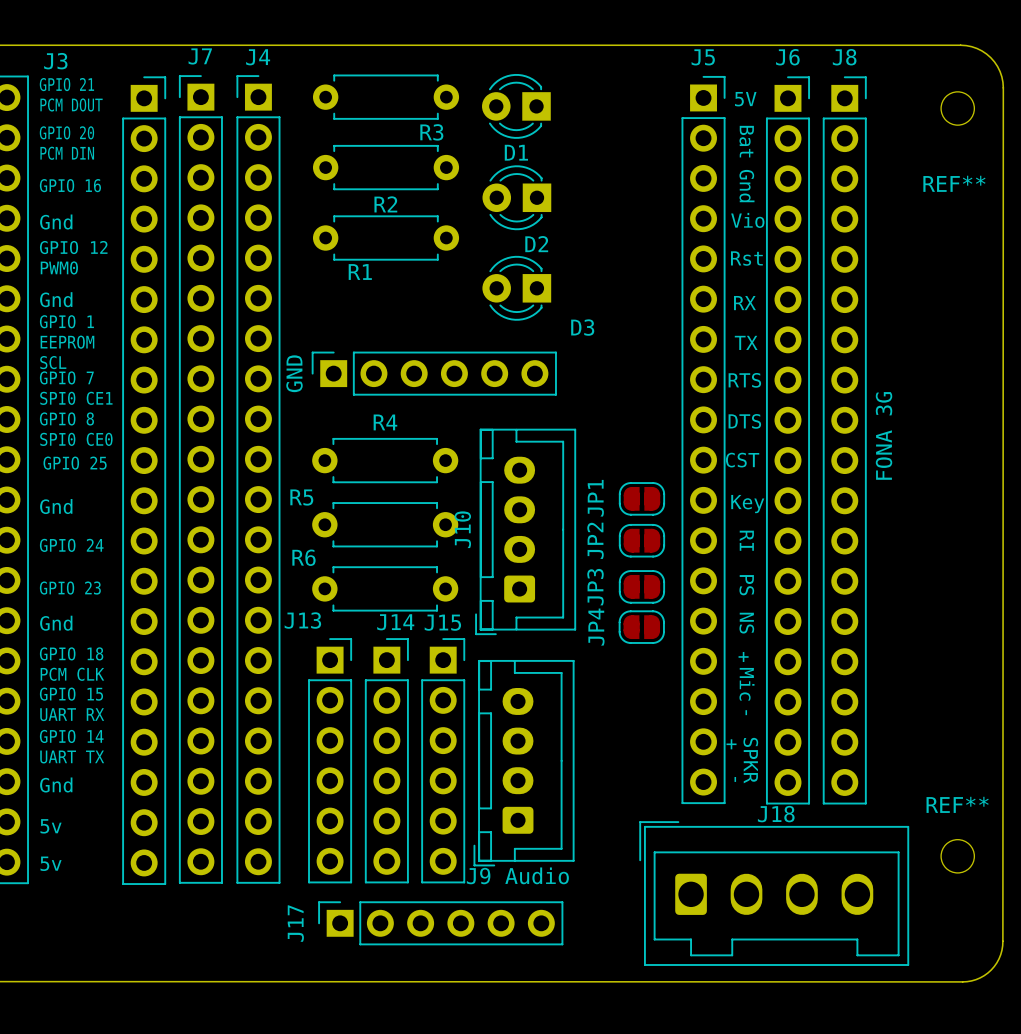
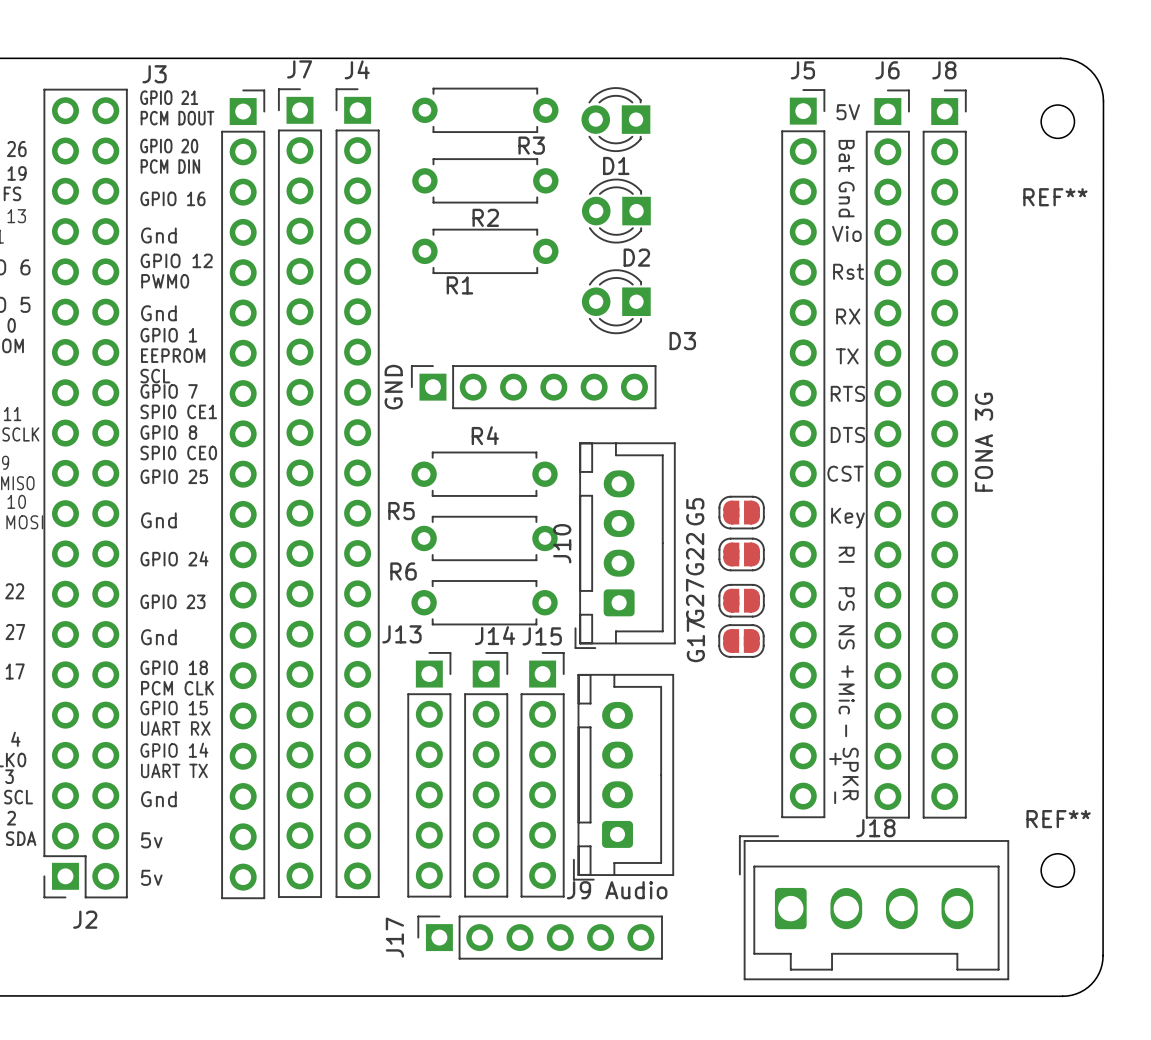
JP1 name: JP1 (595, 498) -> G5 (695, 511)
JP2 name: JP2 (595, 540) -> G22 (695, 554)
JP3 name: JP3 (595, 587) -> G27 (695, 600)
JP4 name: JP4 (596, 627) -> G17 (695, 640)

